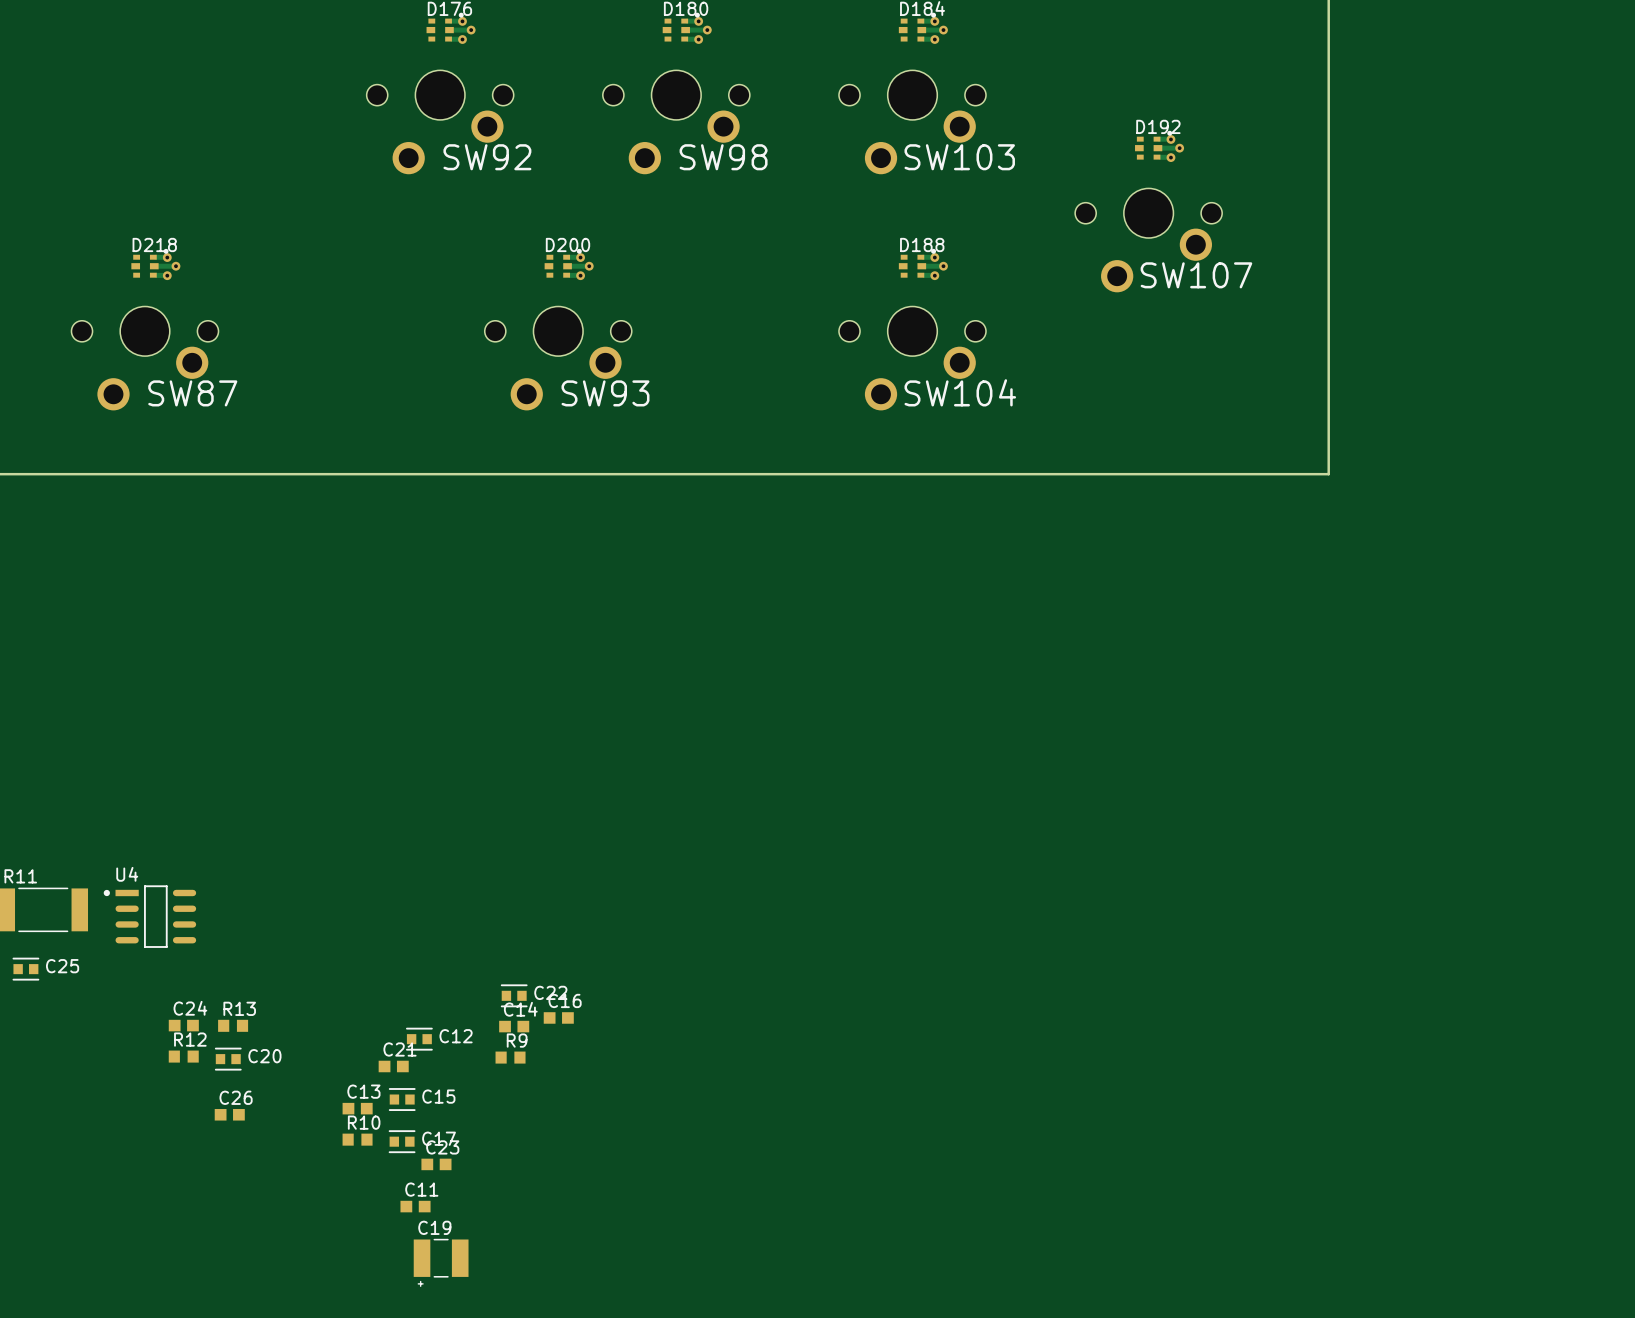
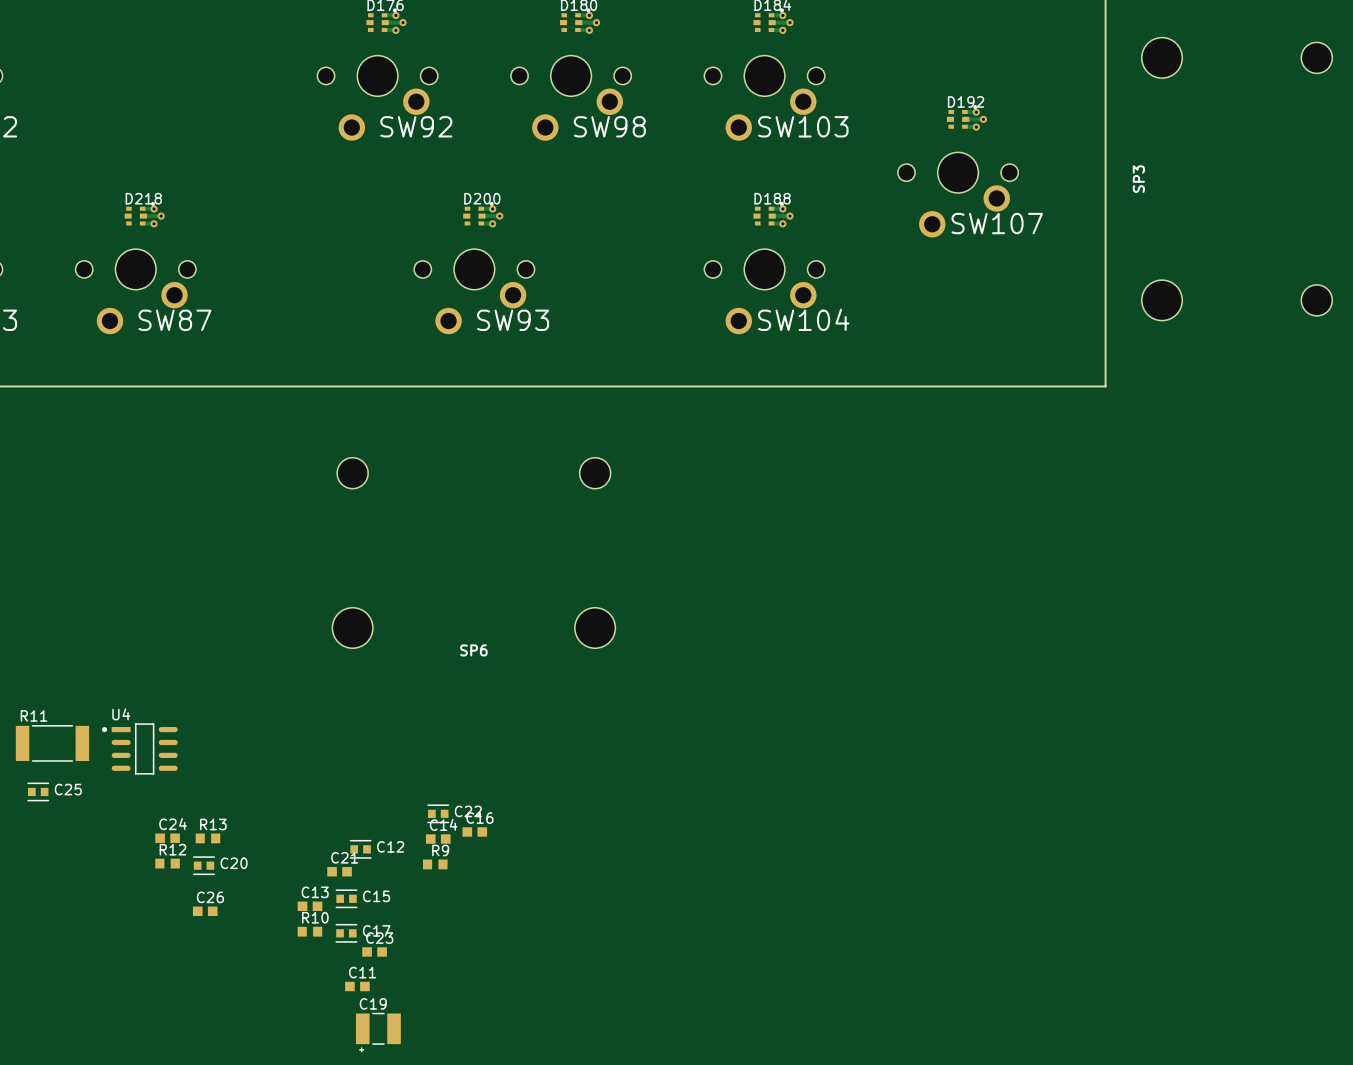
SP3: none -> (1237, 179)
SP6: none -> (473, 552)

